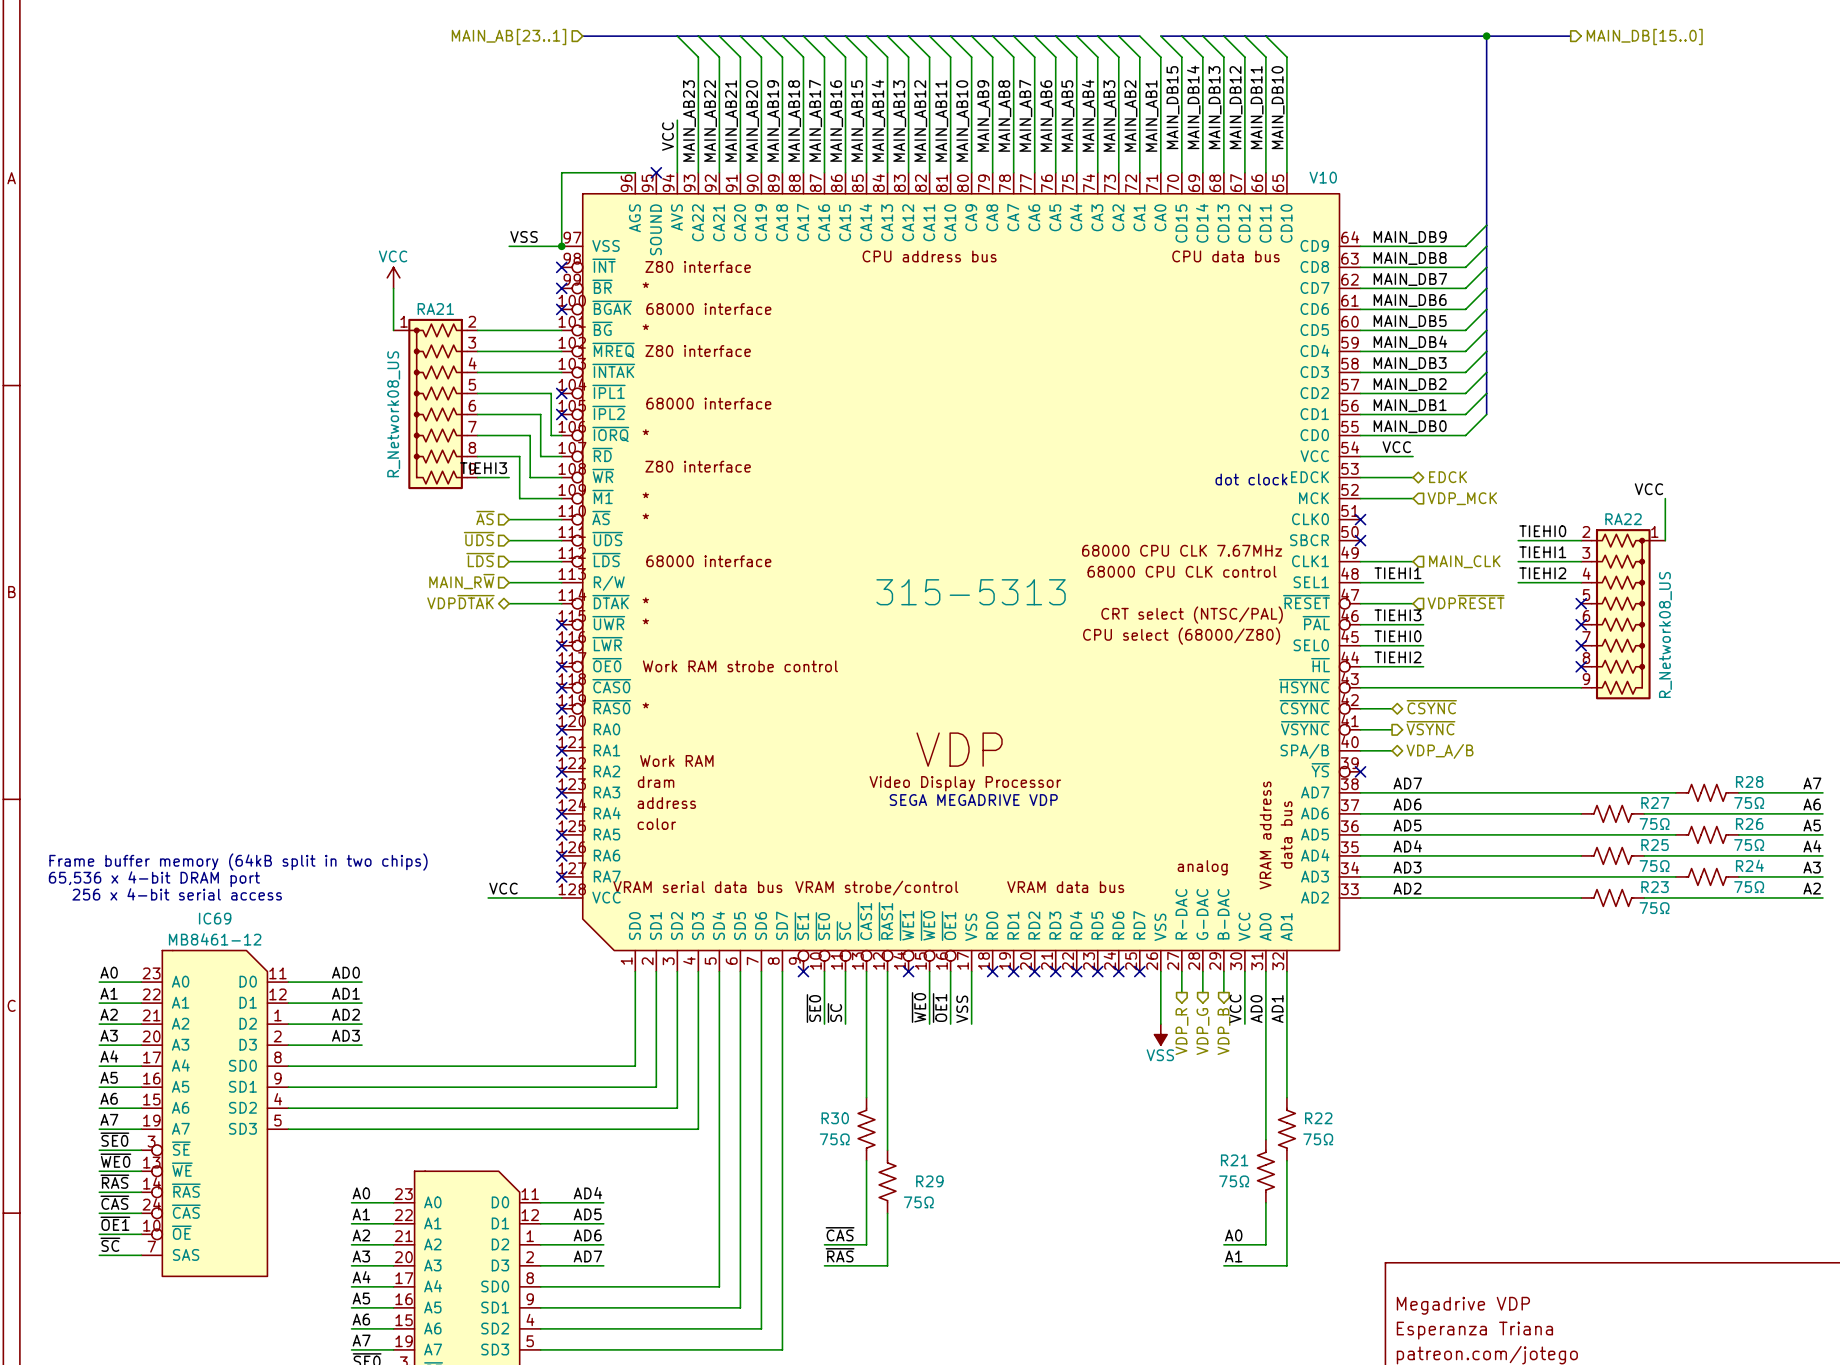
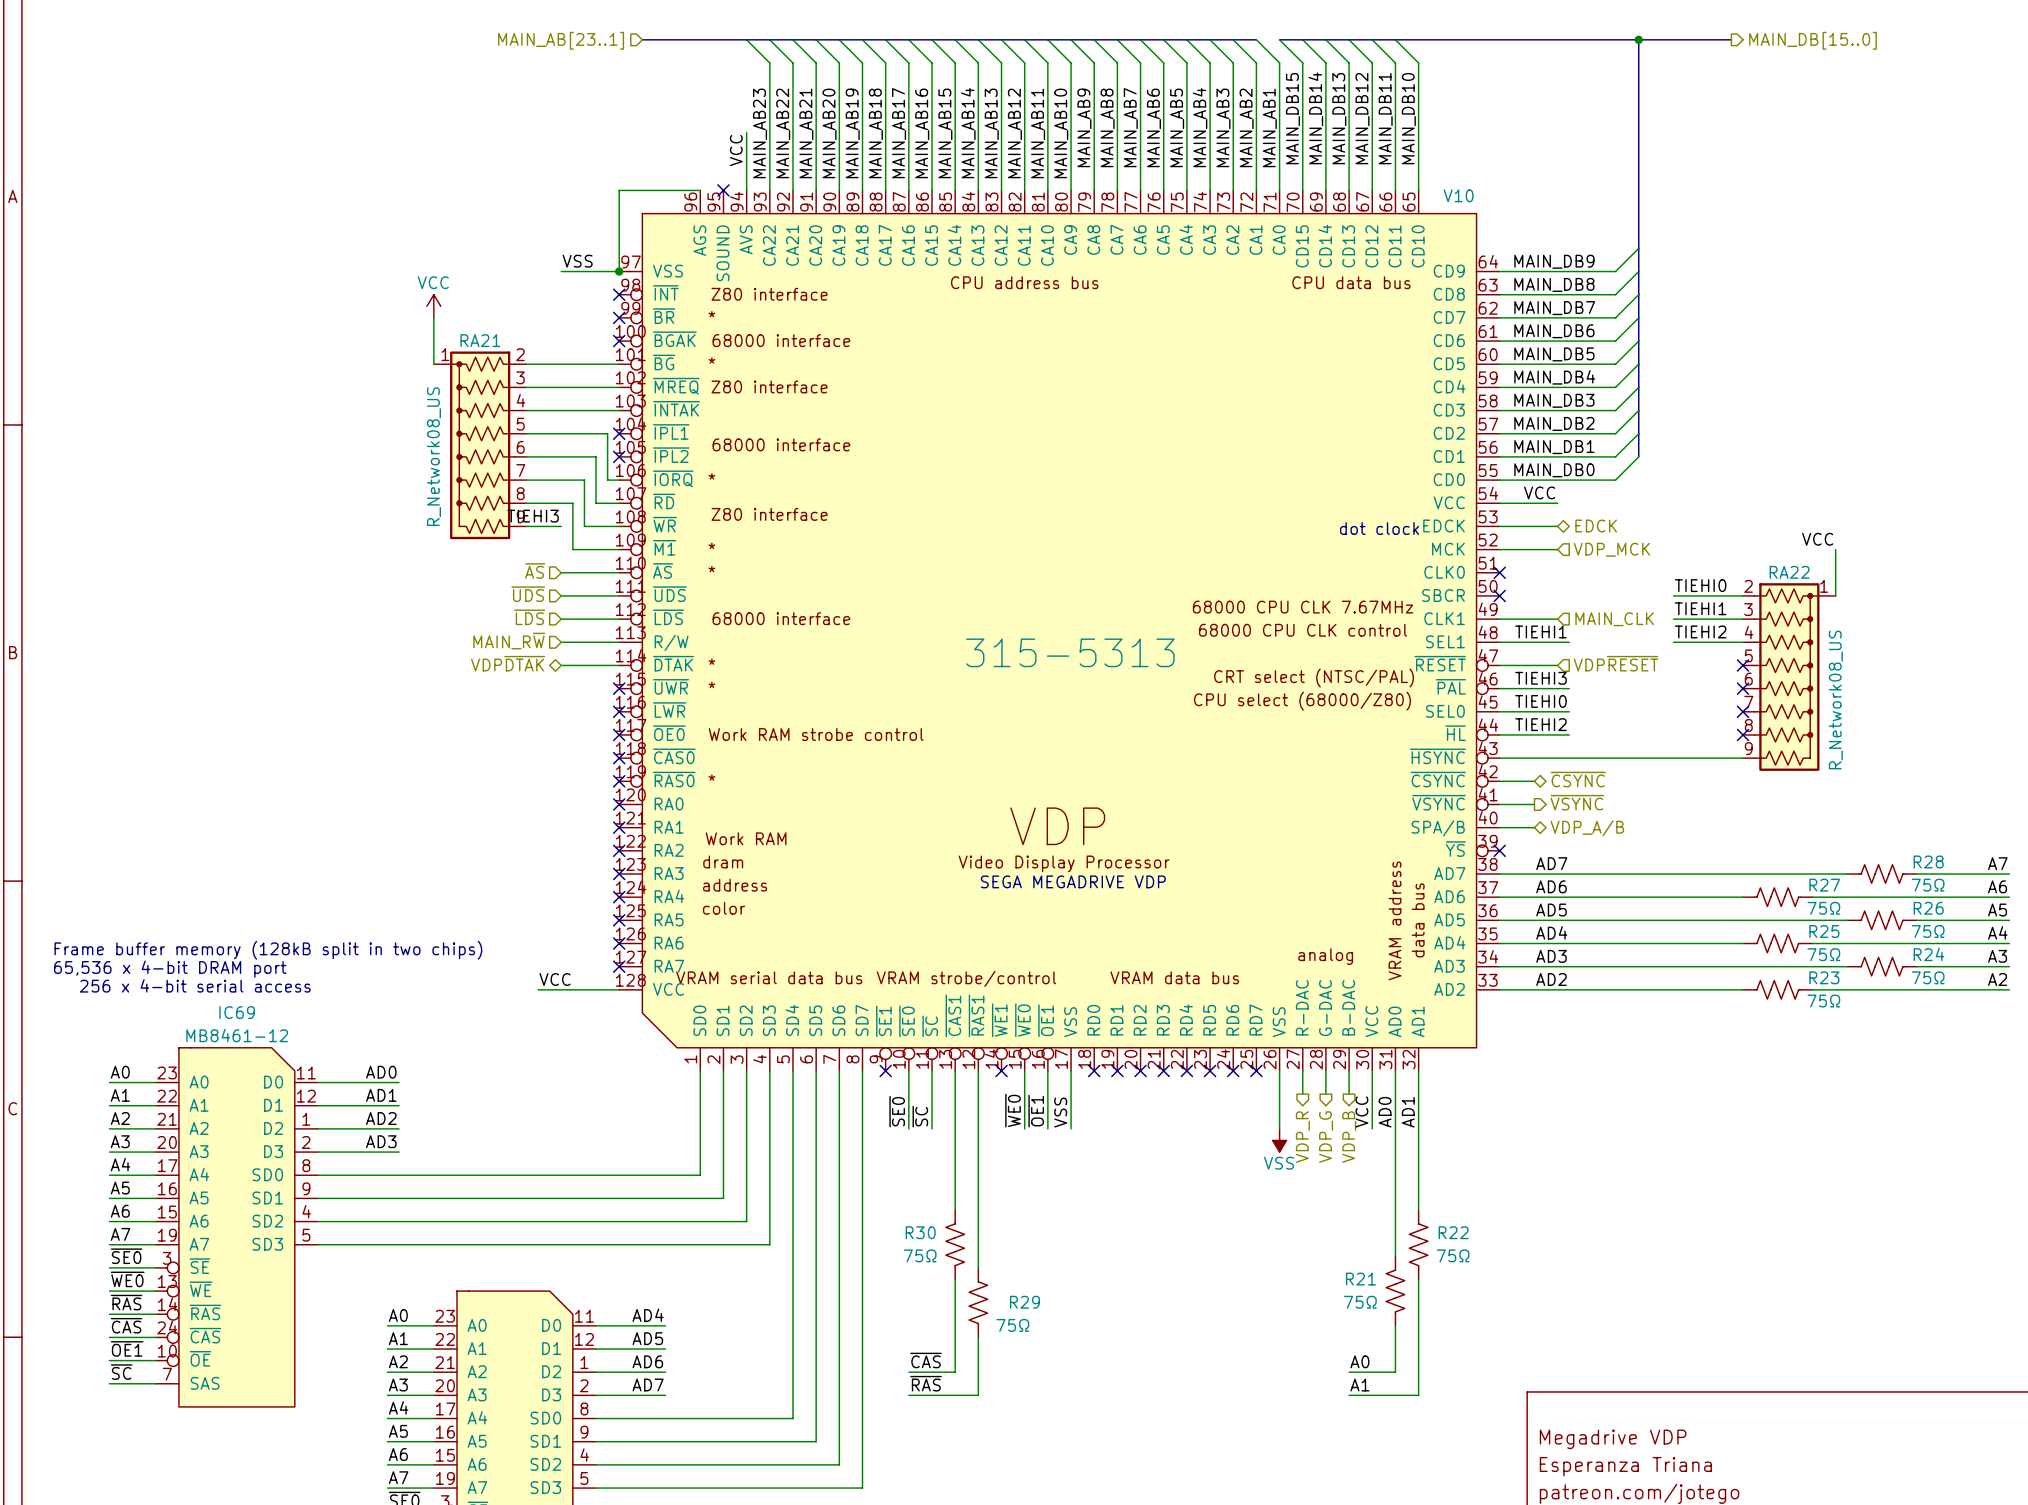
text: Frame buffer memory (64kB split in two chips) (238, 862) -> Frame buffer memory (128kB split in two chips) (268, 950)

